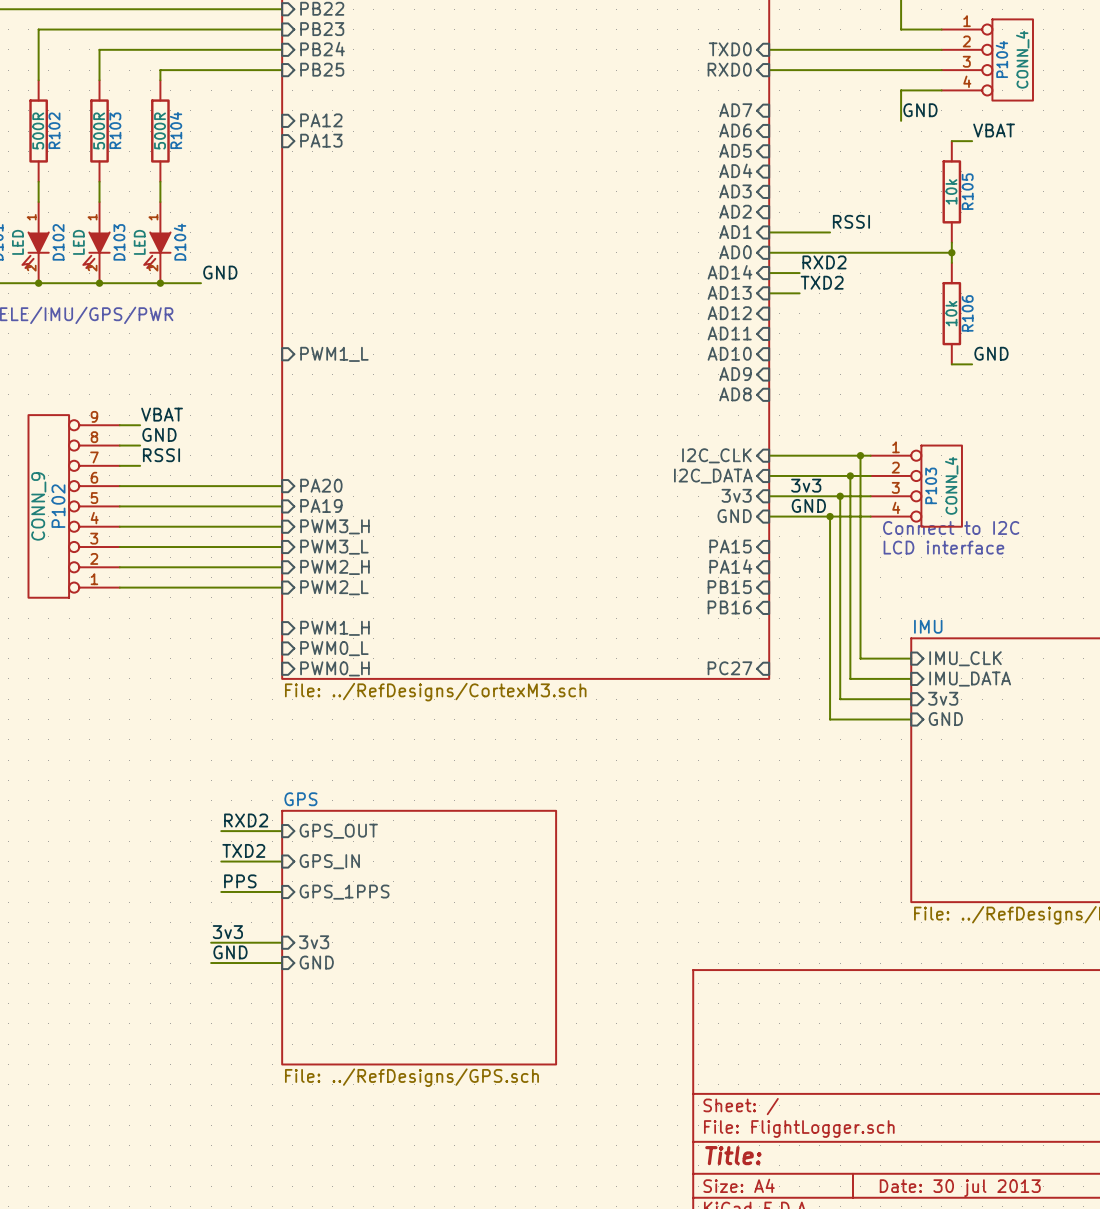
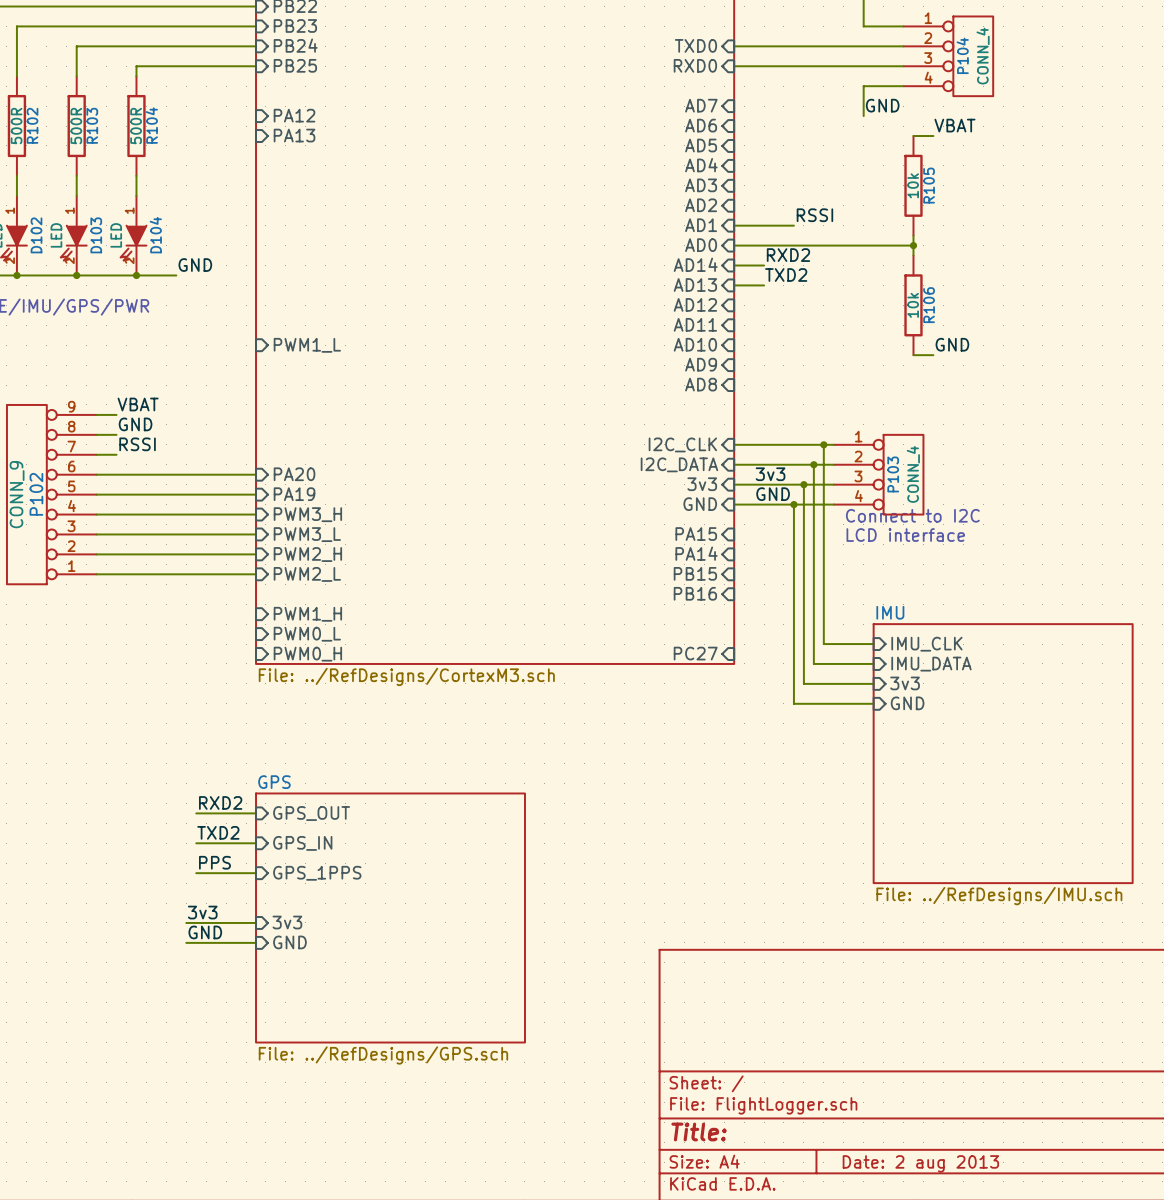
title block: Date: 30 jul 2013 (960, 1188) -> Date: 2 aug 2013 (920, 1163)

